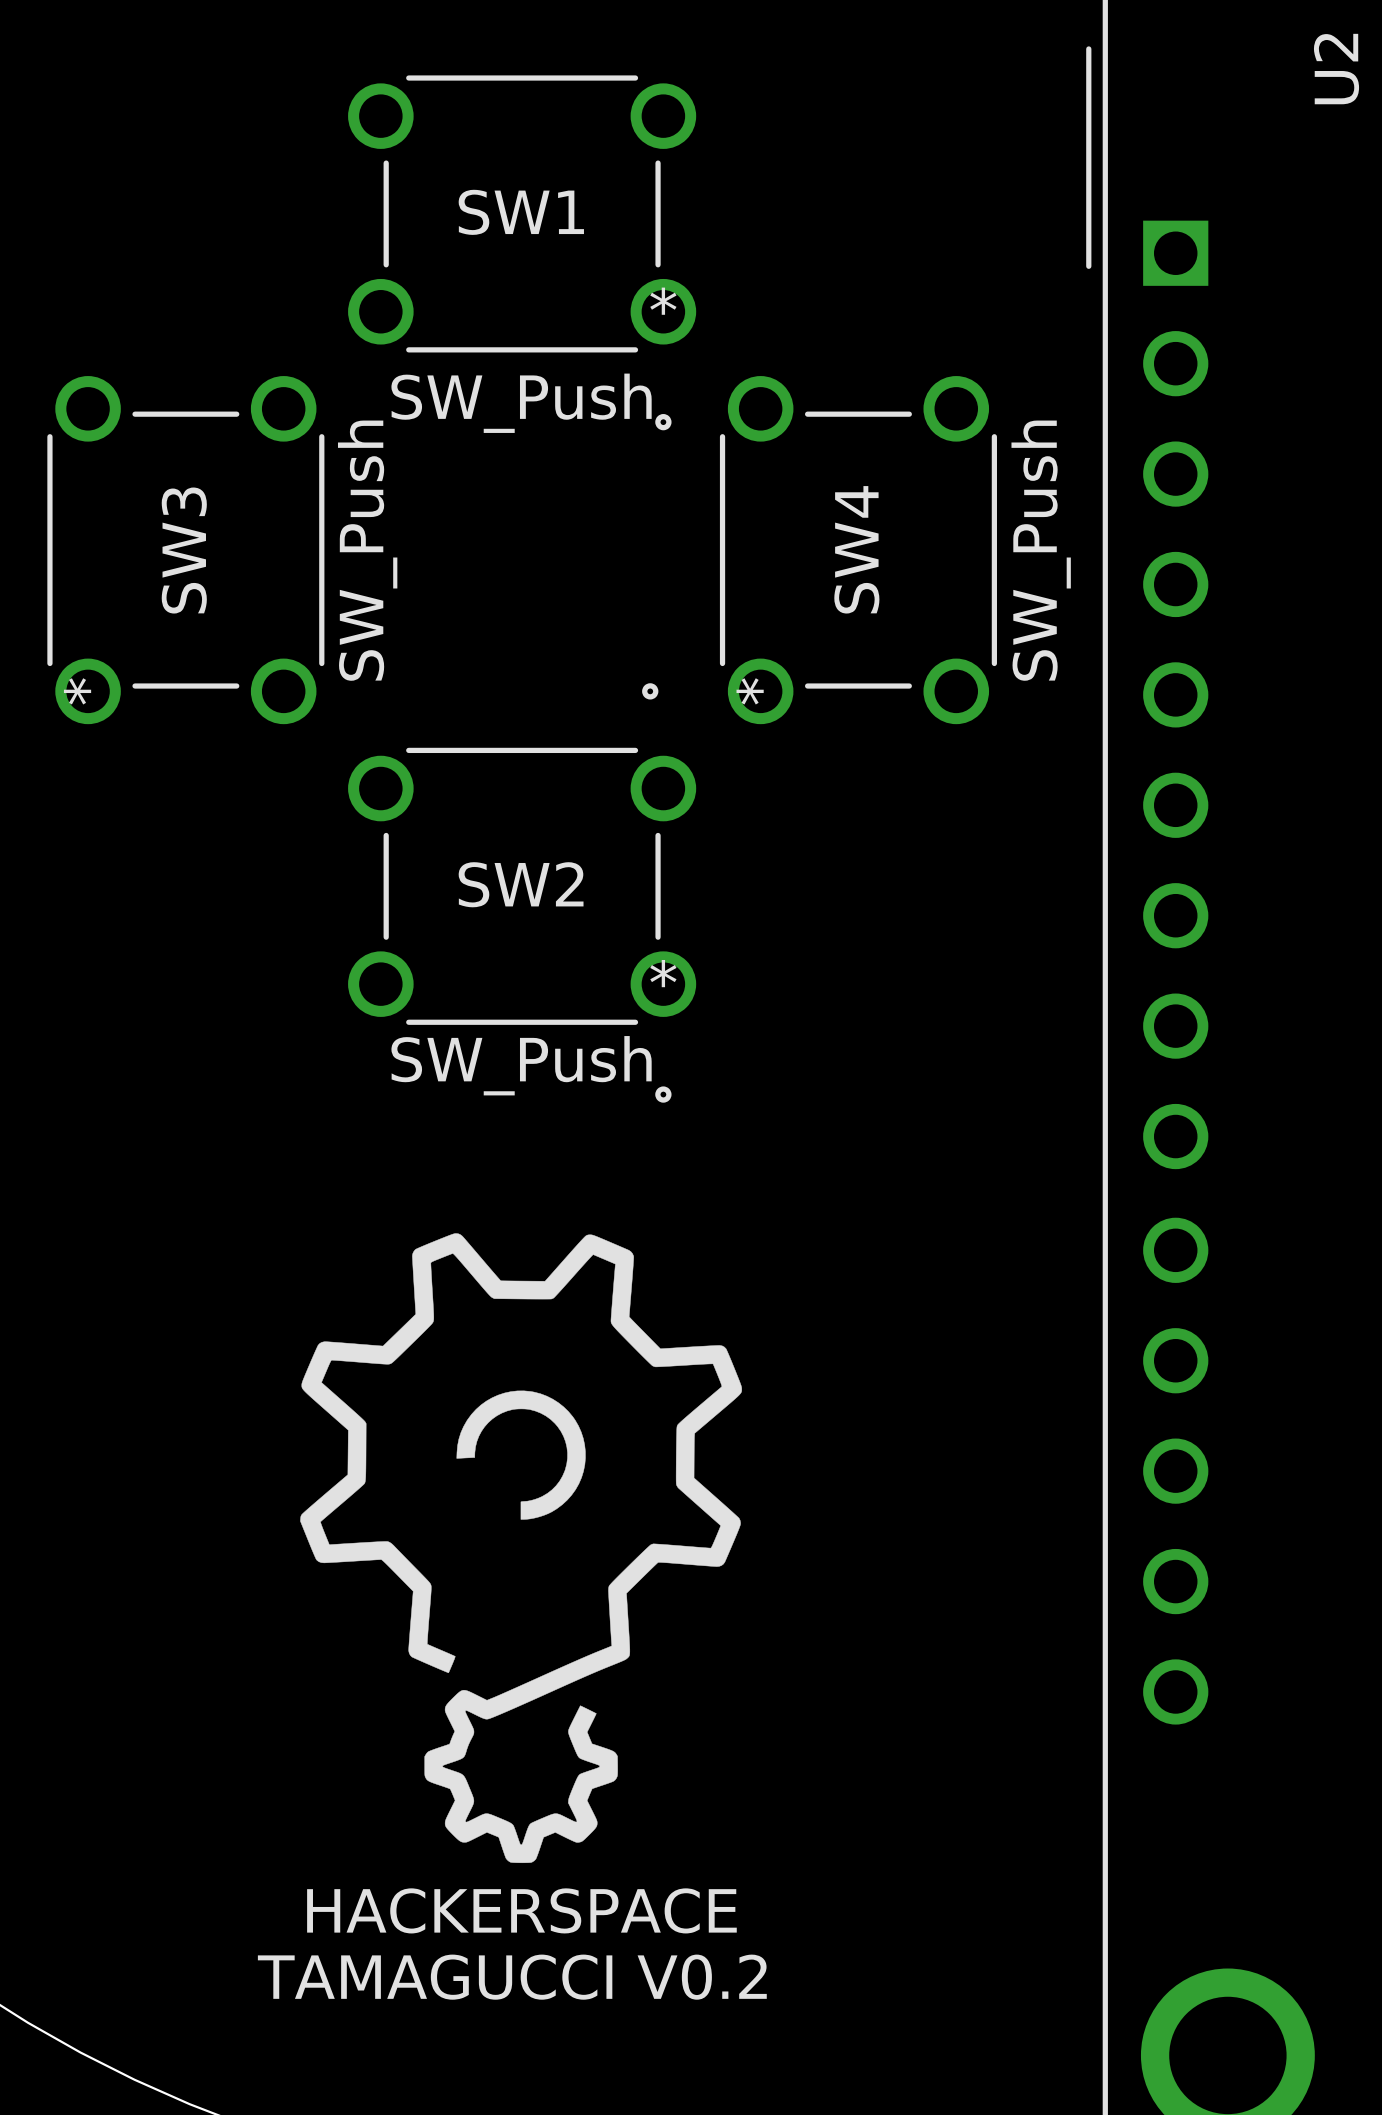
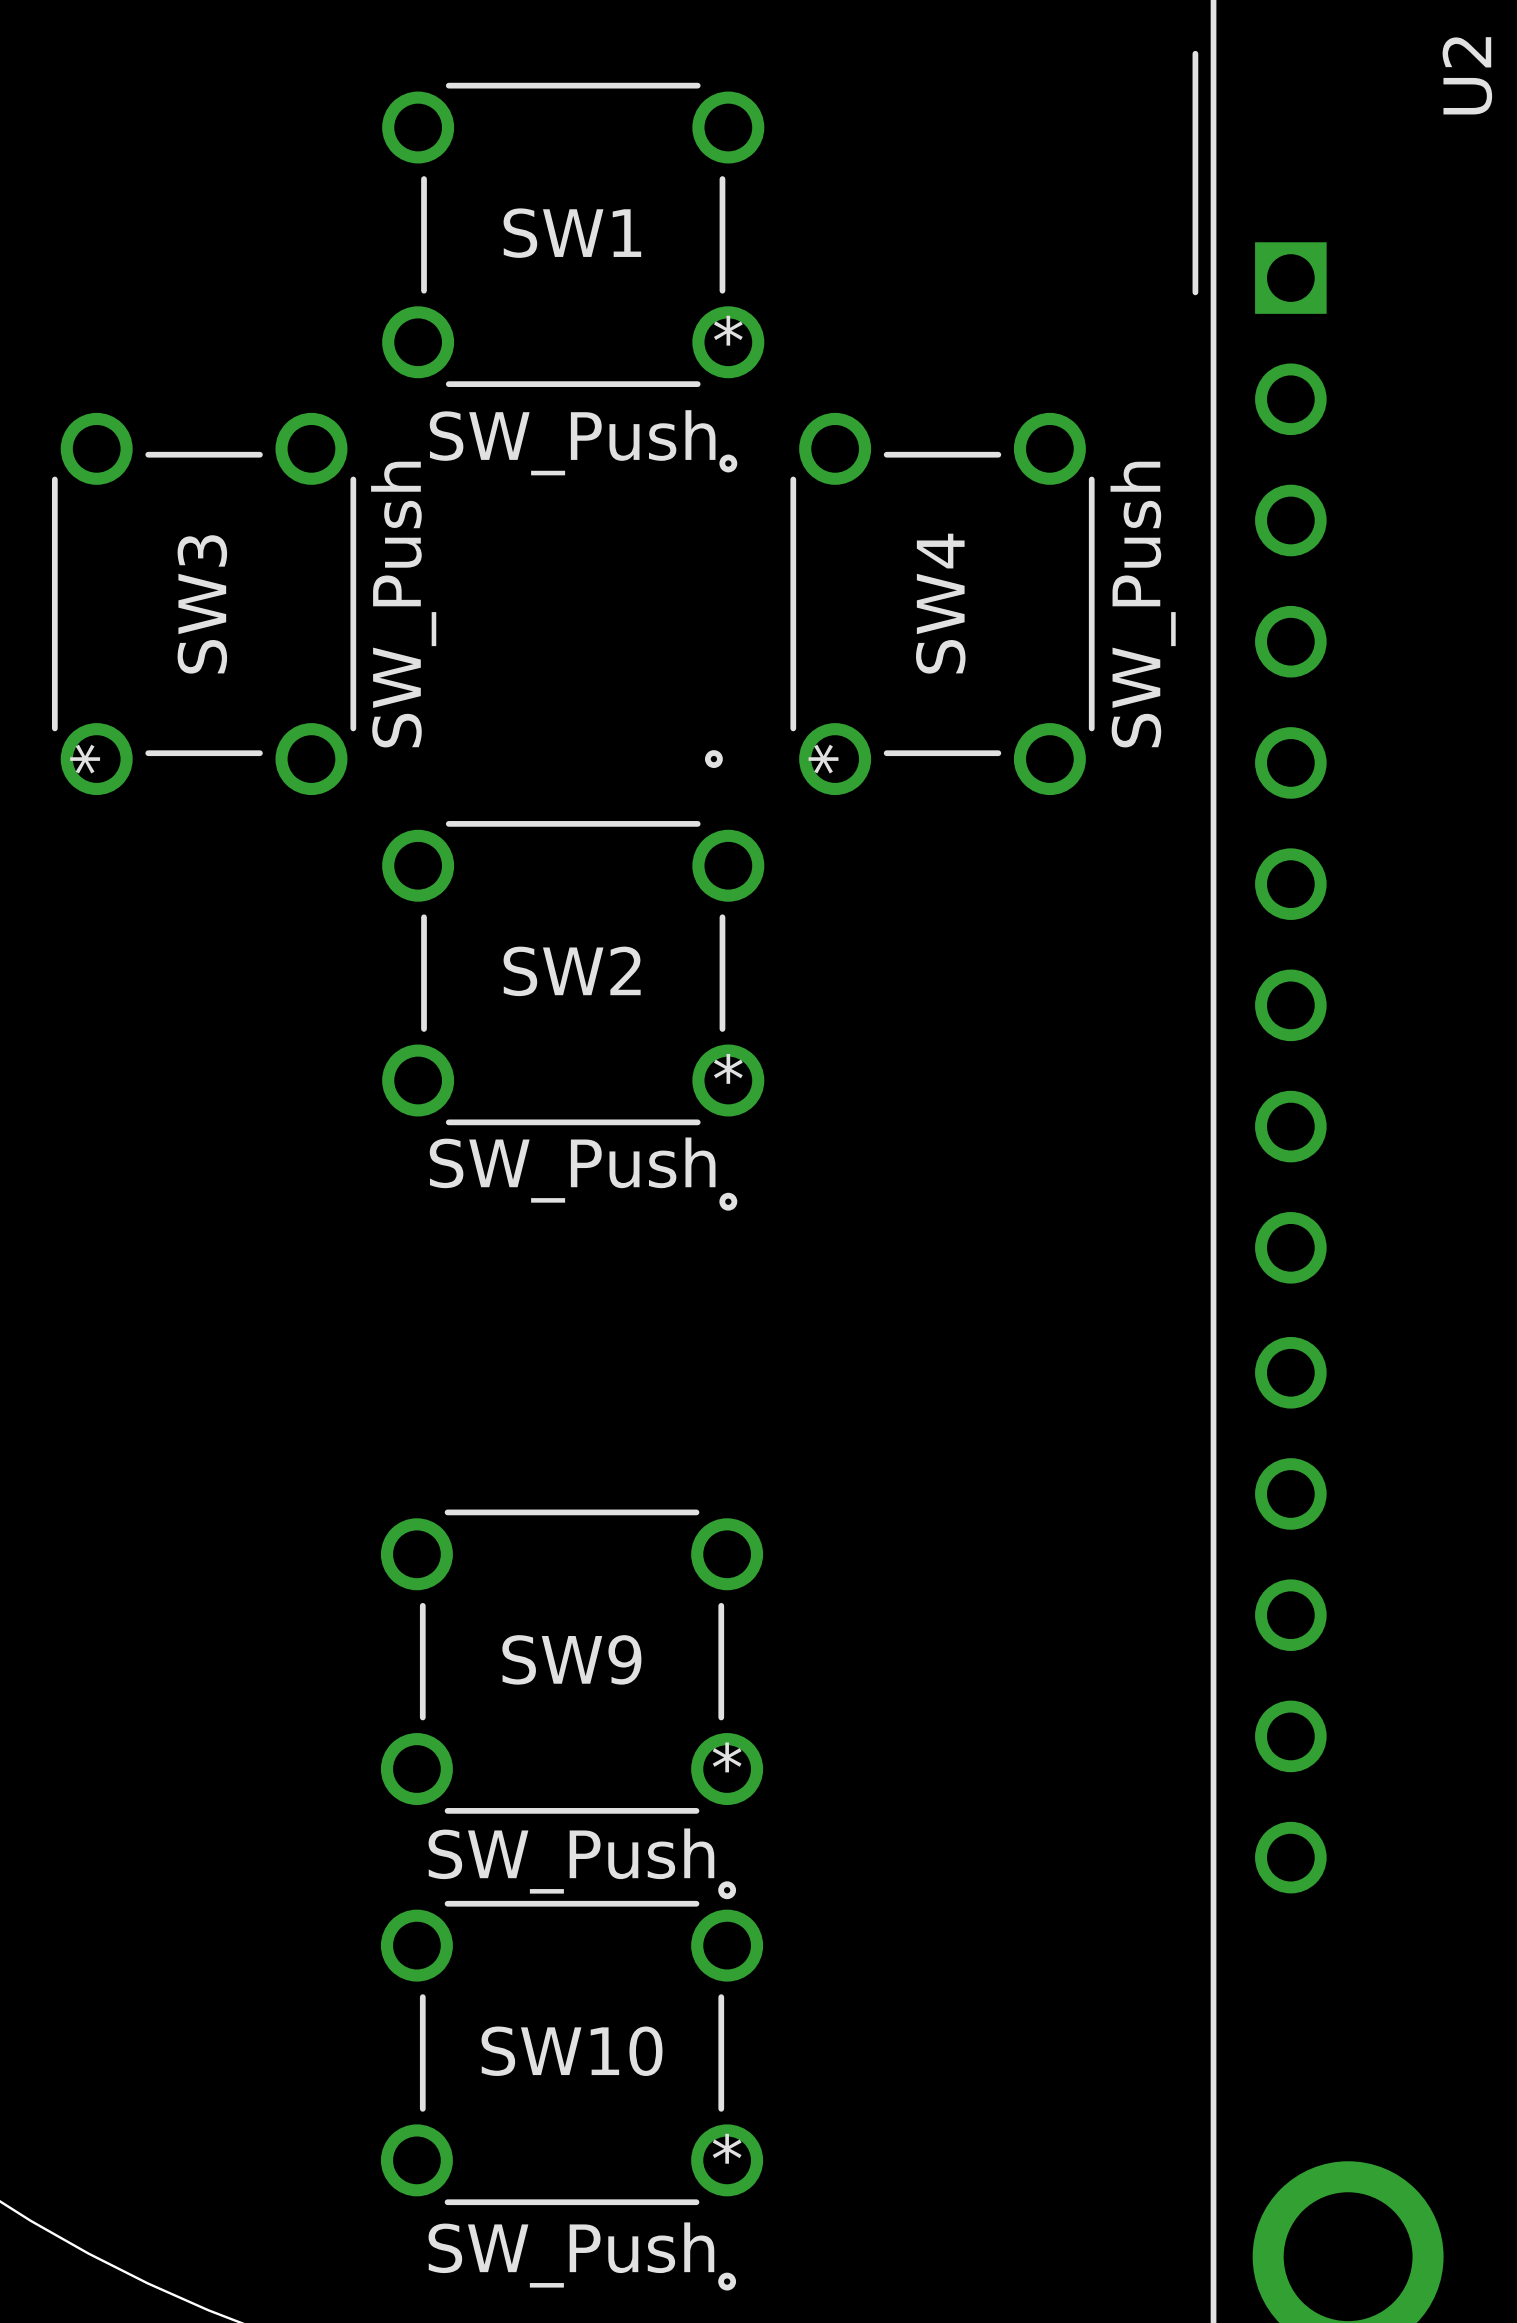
drawing: [300, 1233, 742, 1864] -> none
SW9: none -> SW_Push (572, 1704)
SW10: none -> SW_Push (572, 2095)
text: HACKERSPACE (521, 1910) -> none
text: TAMAGUCCI V0.2 (512, 1977) -> none

